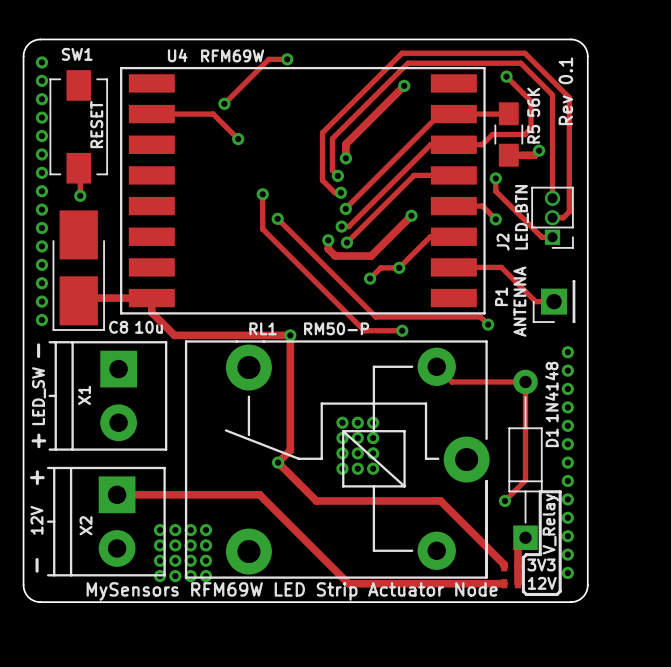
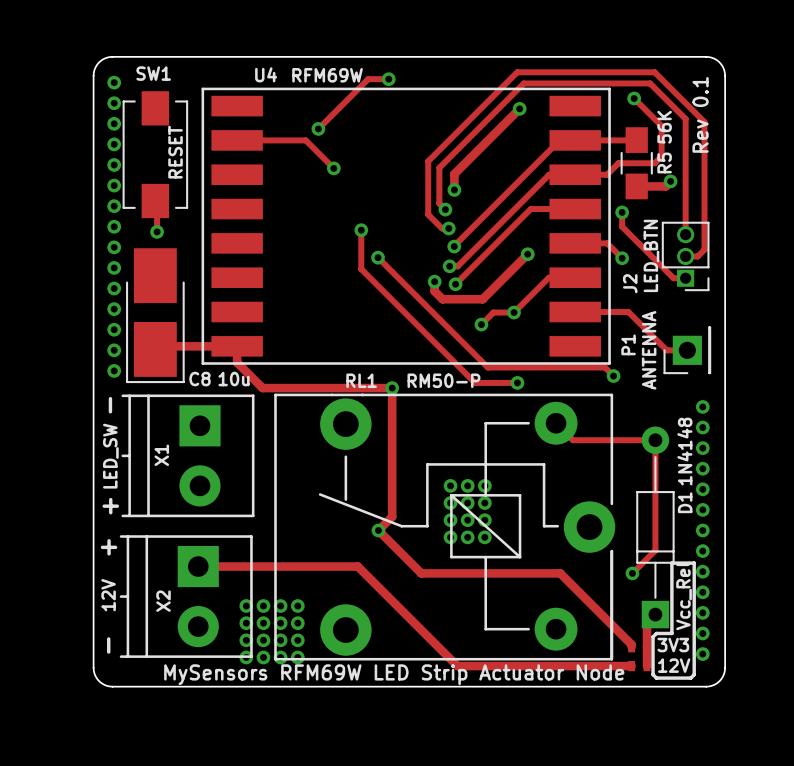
text: V_Relay (550, 524) -> Vcc_Rel (684, 596)

